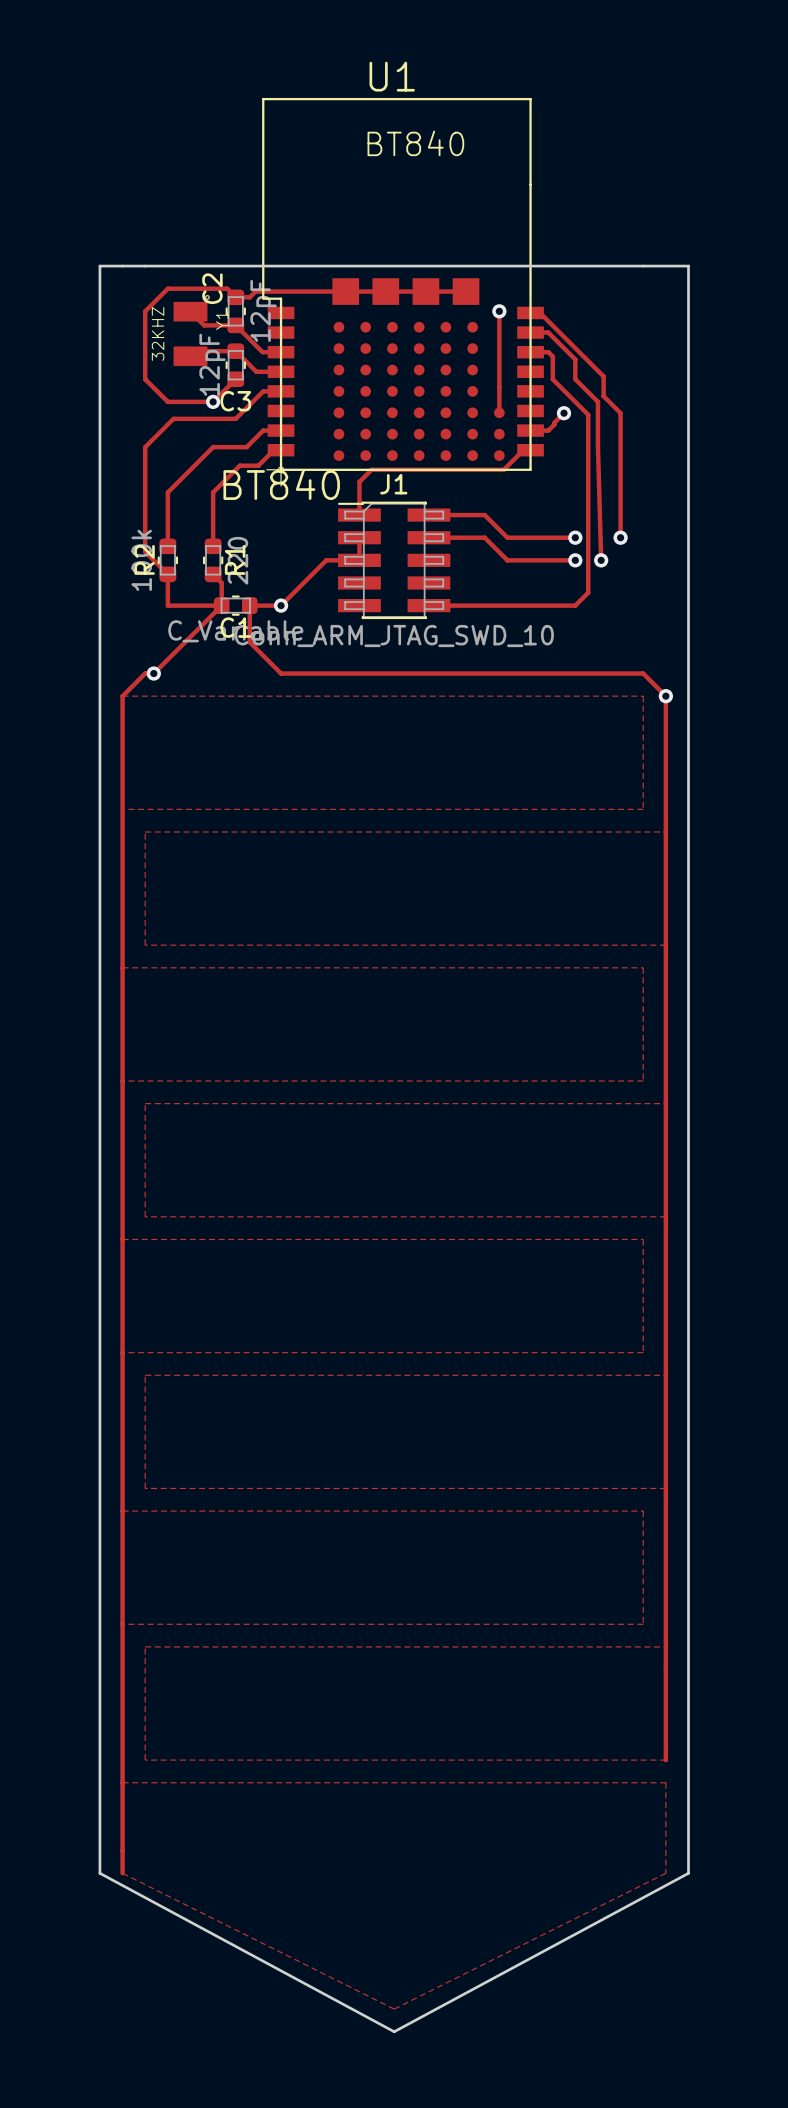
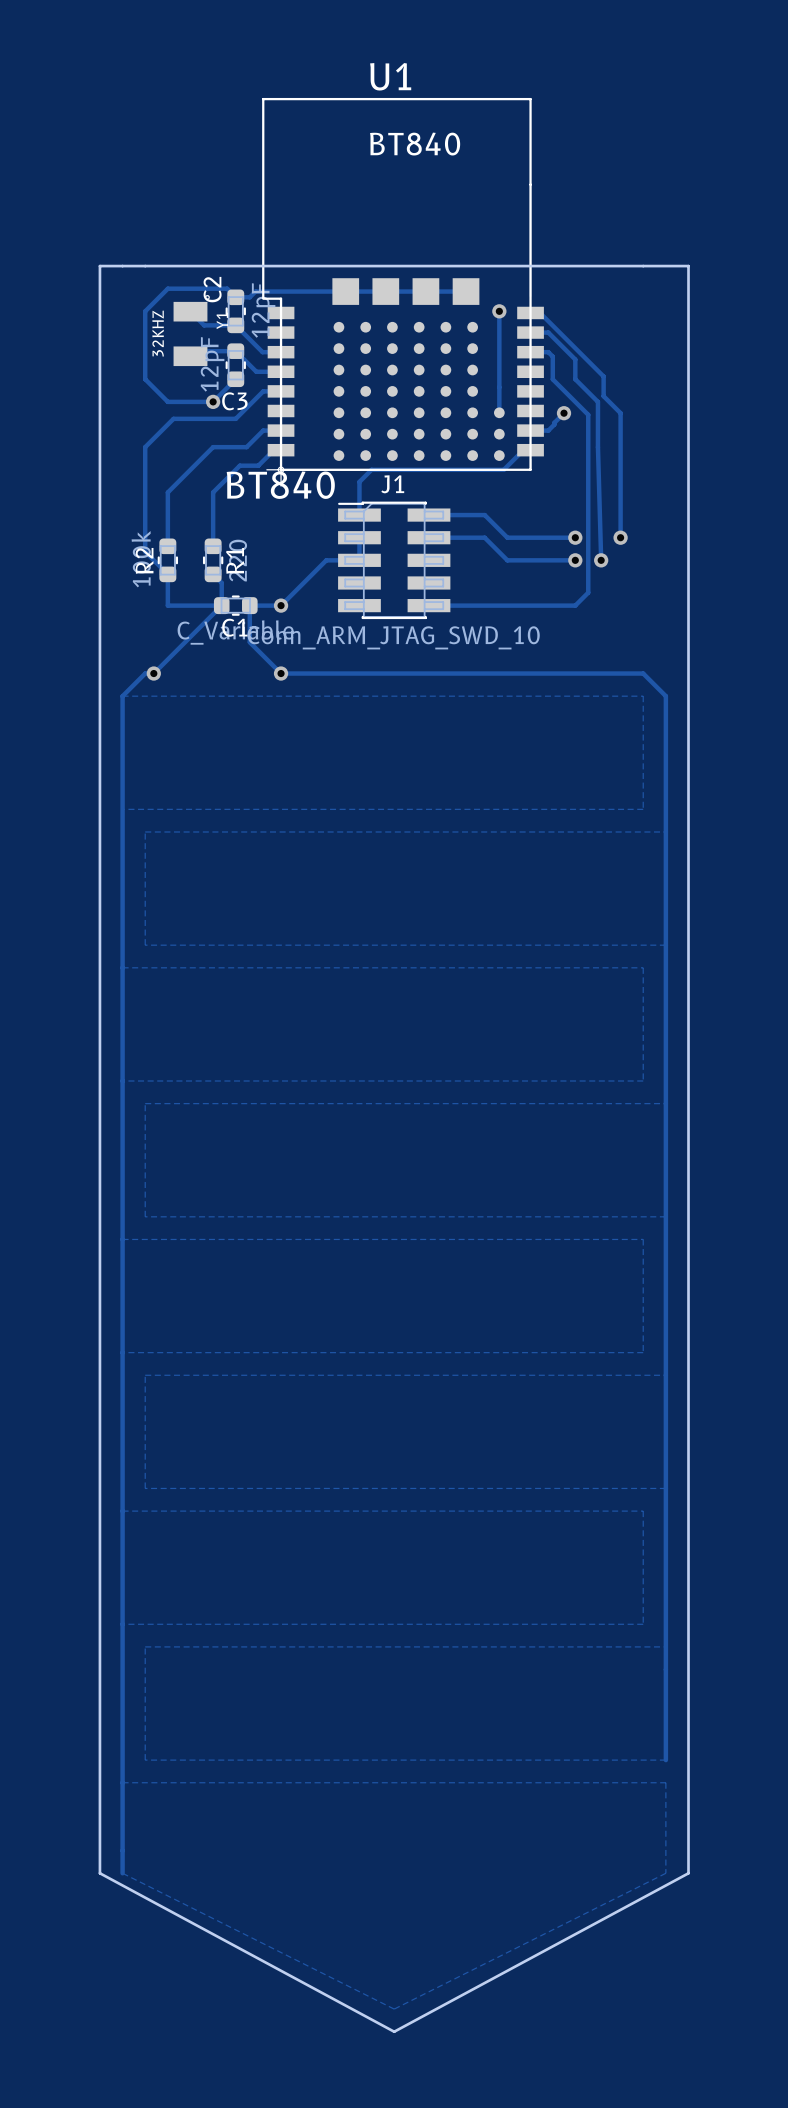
via: none -> (281, 673)
via: (665, 696) -> none

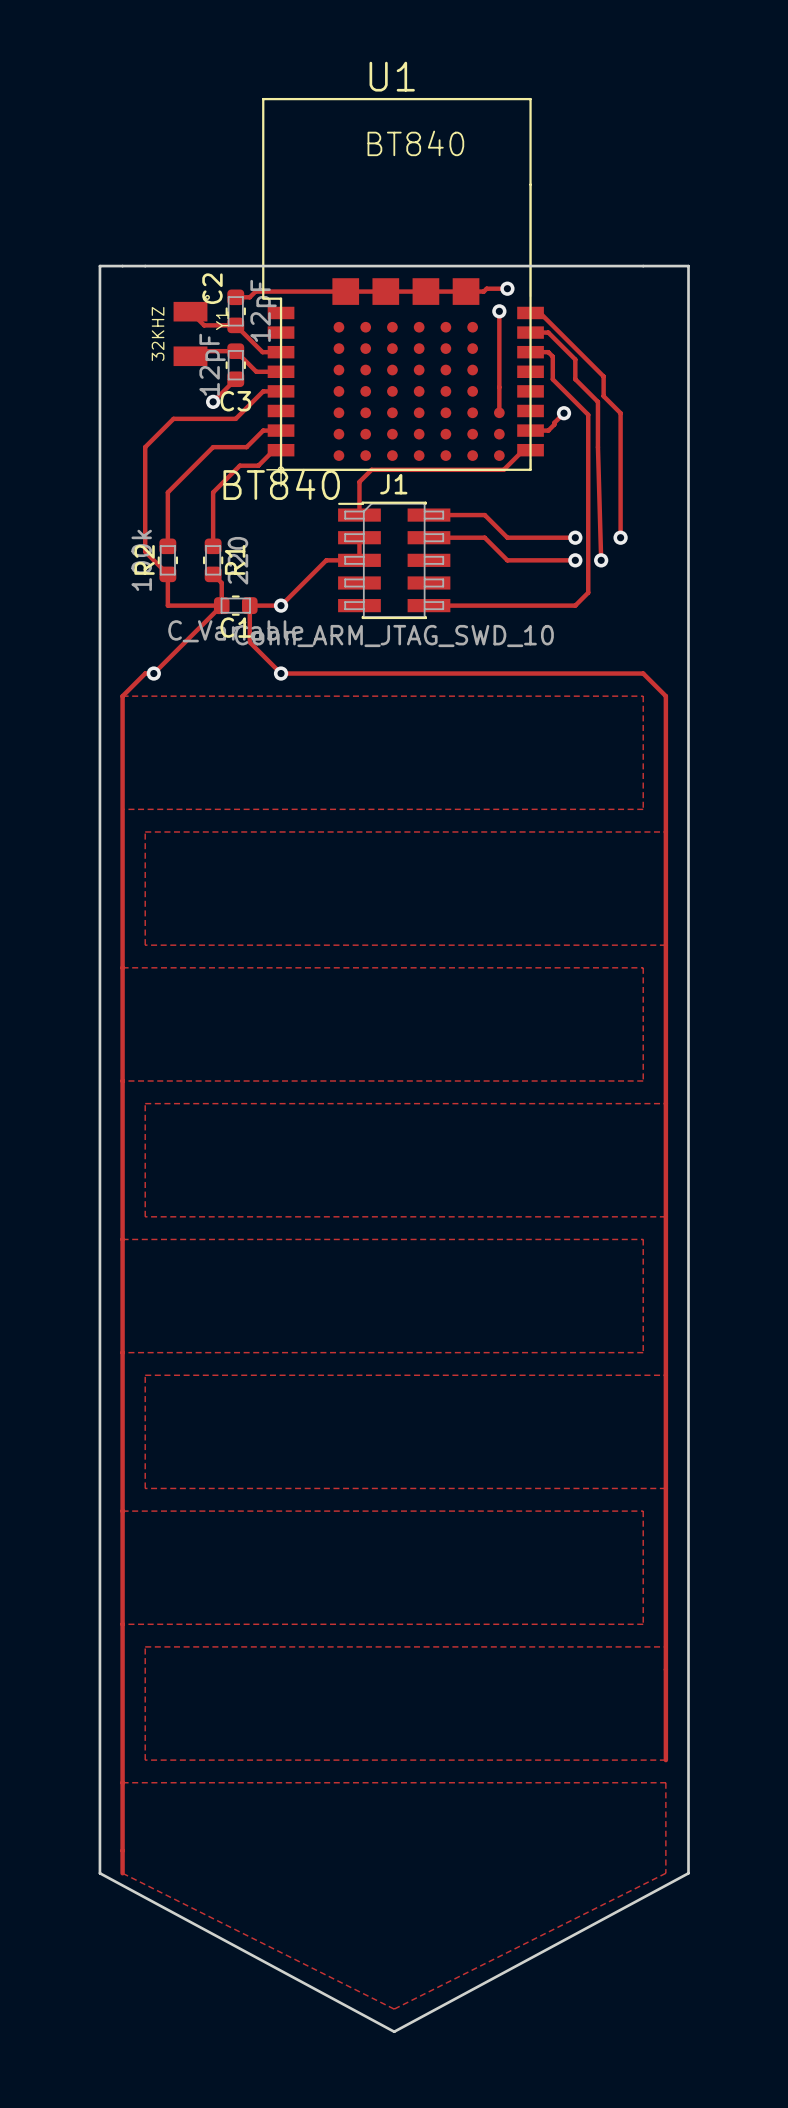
track: none -> (507, 288) (466, 291)
via: none -> (507, 288)
track: (235, 297) (227, 288) (167, 288) (145, 311) (145, 379) (167, 401) (213, 401) -> none

